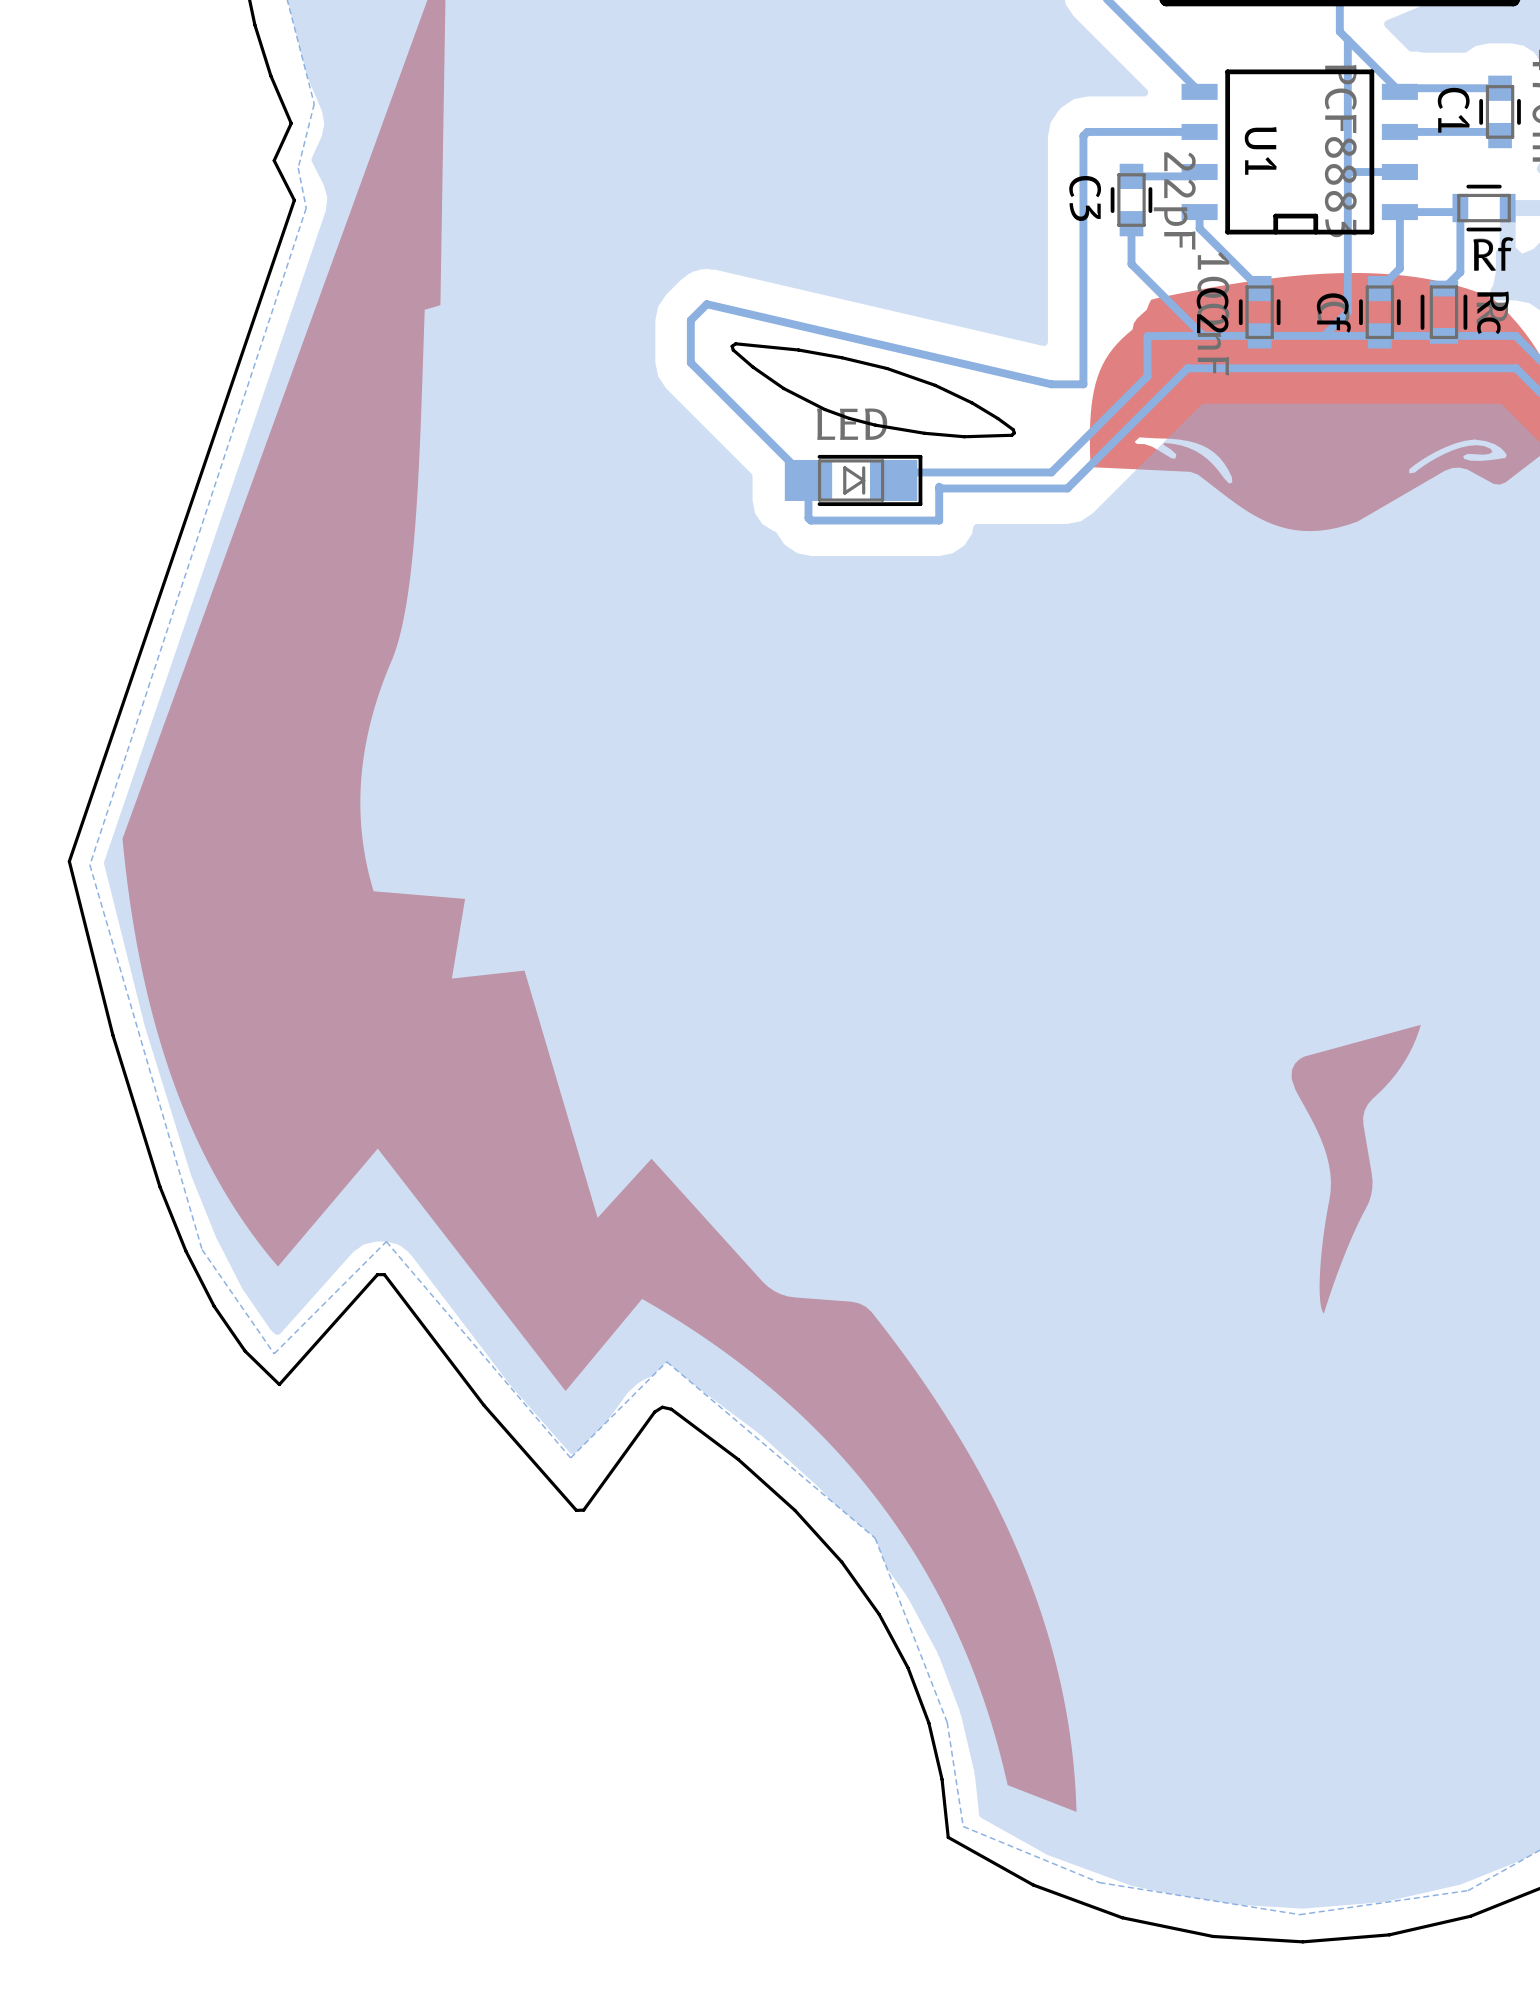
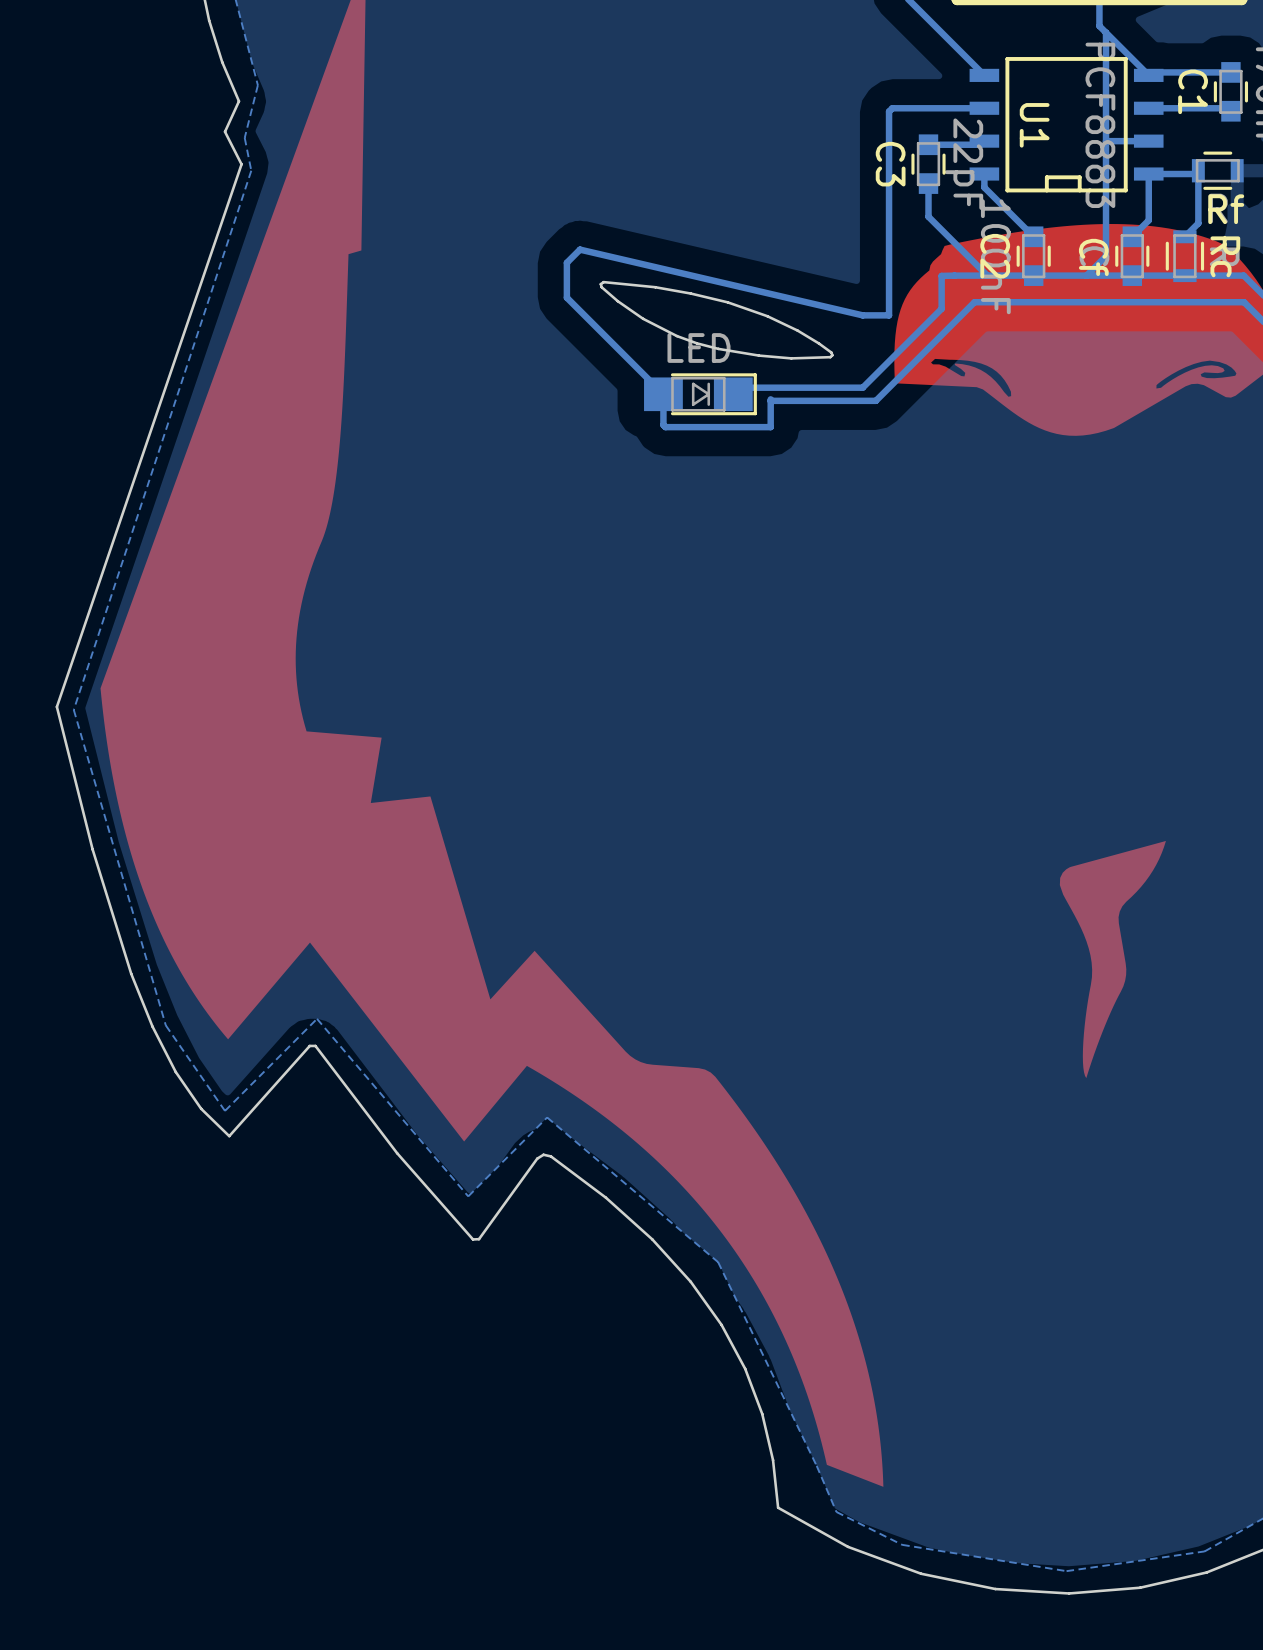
bottom zone outline: (875, 1538) (947, 1722) (963, 1826) (1099, 1882) -> (718, 1262) (816, 1465) (836, 1511) (902, 1544)

